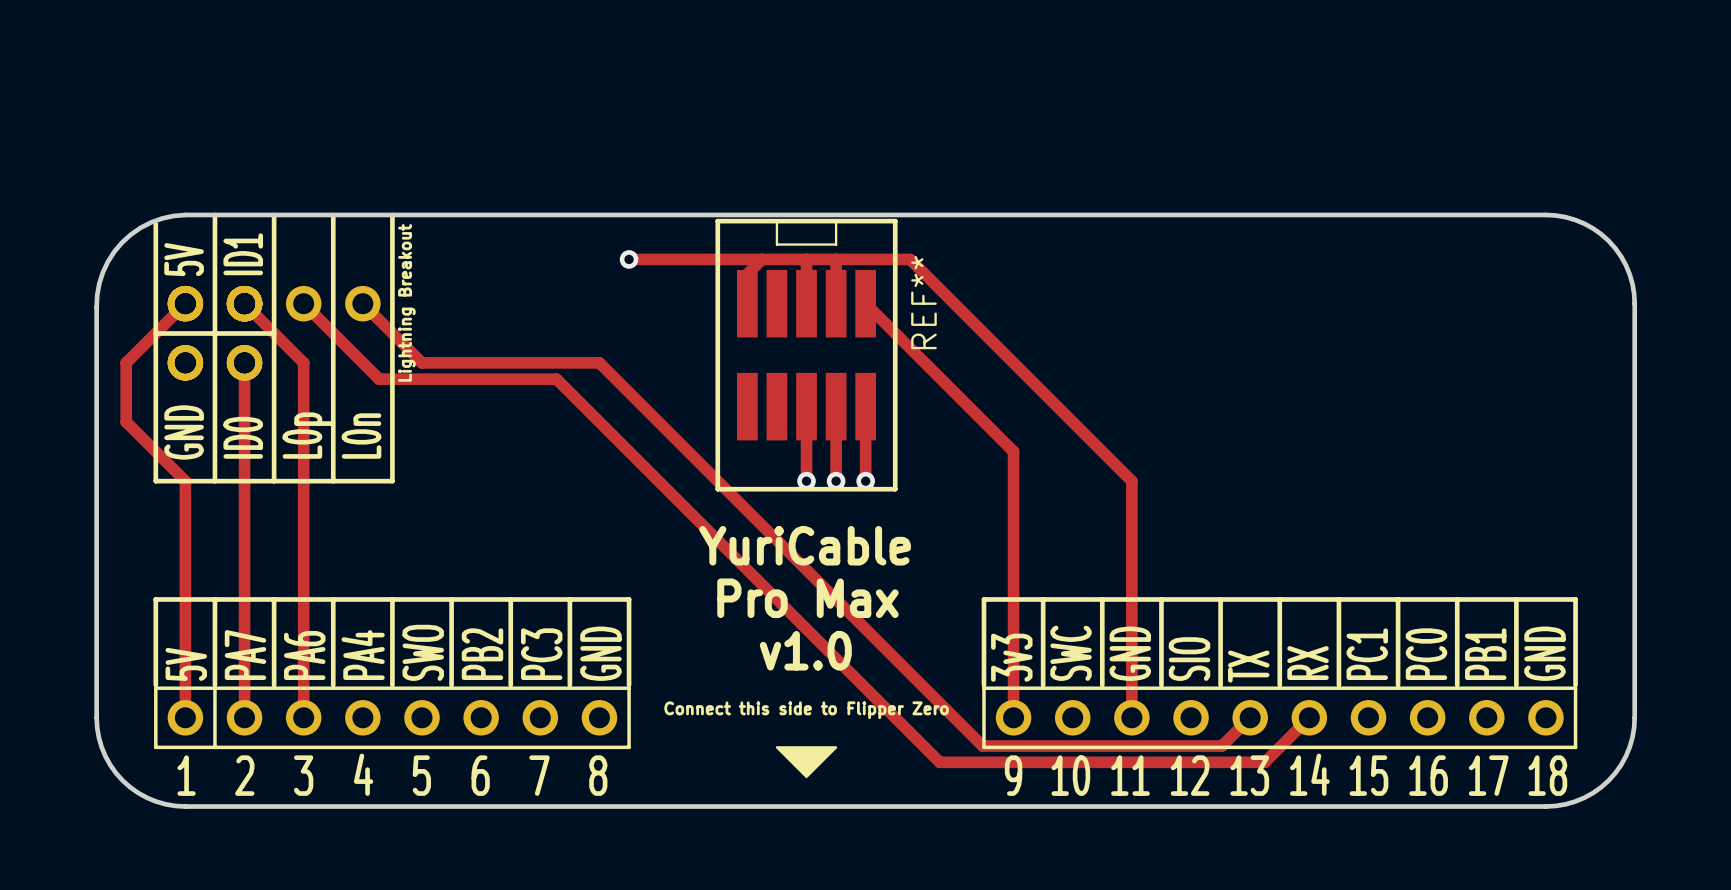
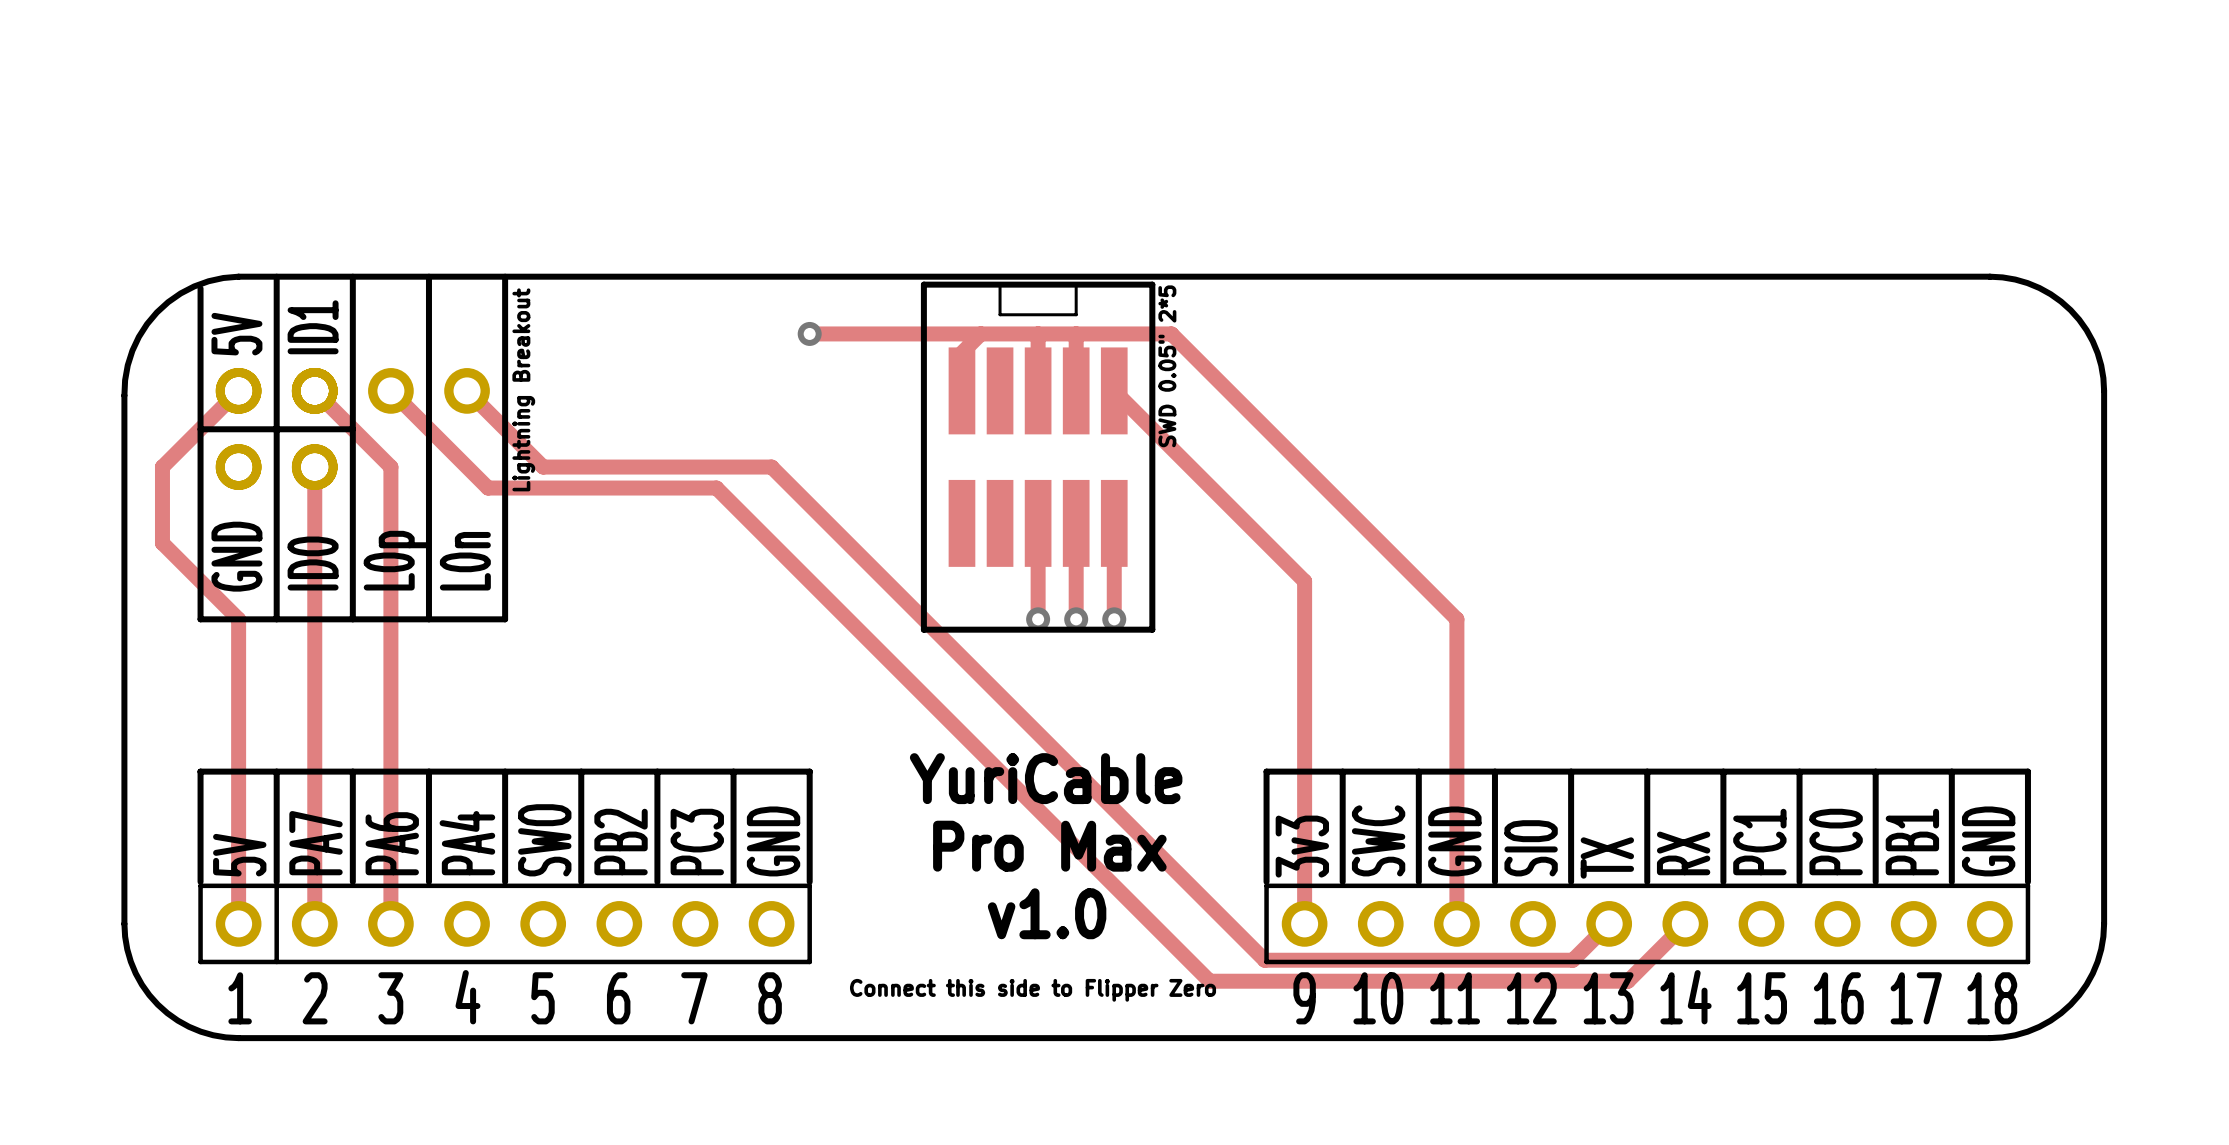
REF** name: REF** (923, 302) -> SWD 0.05" 2*5 (1167, 366)
text: YuriCable (805, 545) -> none
text: Pro Max (807, 598) -> YuriCable (1046, 778)
text: v1.0 (805, 650) -> Pro Max (1049, 846)
text: Connect this side to Flipper Zero (806, 710) -> v1.0 (1047, 913)
drawing: [775, 746, 838, 779] -> none
text: none -> Connect this side to Flipper Zero (1033, 990)

